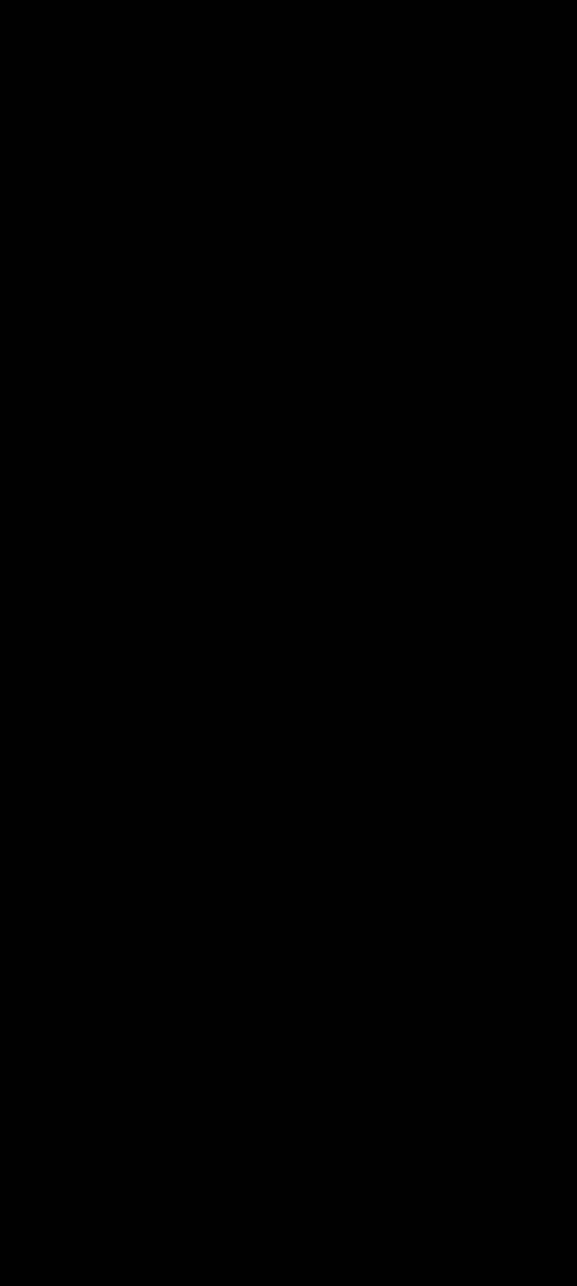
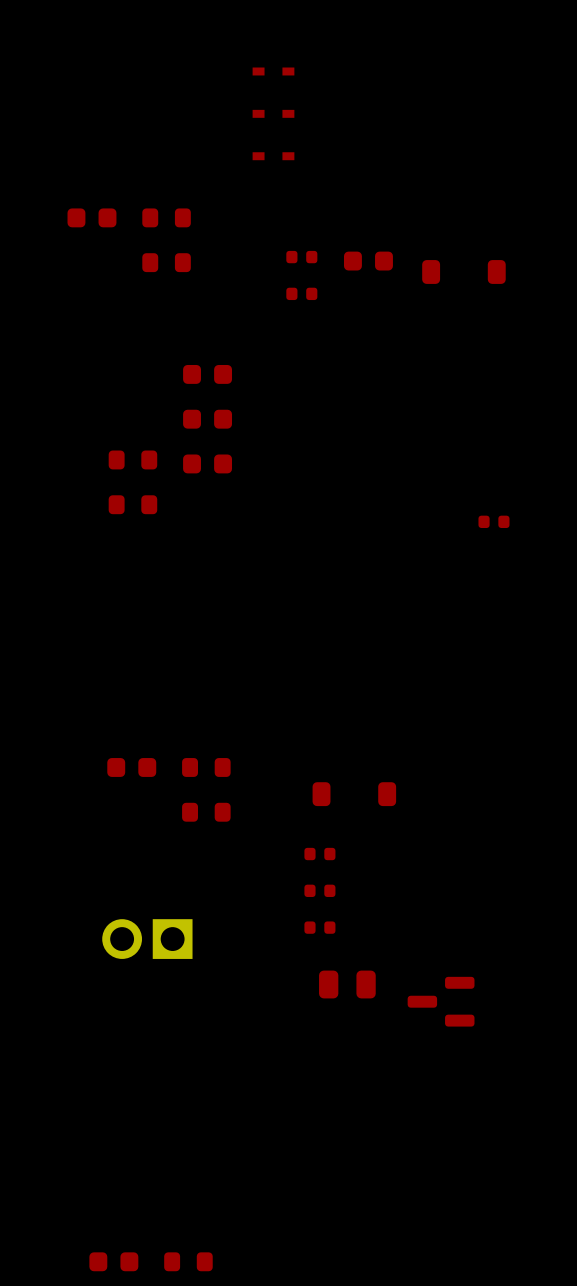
part: none -> (273, 71)
part: none -> (273, 113)
part: none -> (273, 156)
part: none -> (91, 217)
part: none -> (166, 217)
part: none -> (301, 257)
part: none -> (368, 261)
part: none -> (166, 262)
part: none -> (463, 271)
part: none -> (301, 293)
part: none -> (207, 374)
part: none -> (207, 419)
part: none -> (132, 459)
part: none -> (207, 463)
part: none -> (132, 504)
part: none -> (493, 521)
part: none -> (131, 767)
part: none -> (206, 767)
part: none -> (354, 794)
part: none -> (206, 812)
part: none -> (319, 854)
part: none -> (319, 890)
part: none -> (319, 927)
part: none -> (147, 939)
part: none -> (347, 984)
part: none -> (441, 1001)
part: none -> (113, 1261)
part: none -> (188, 1261)

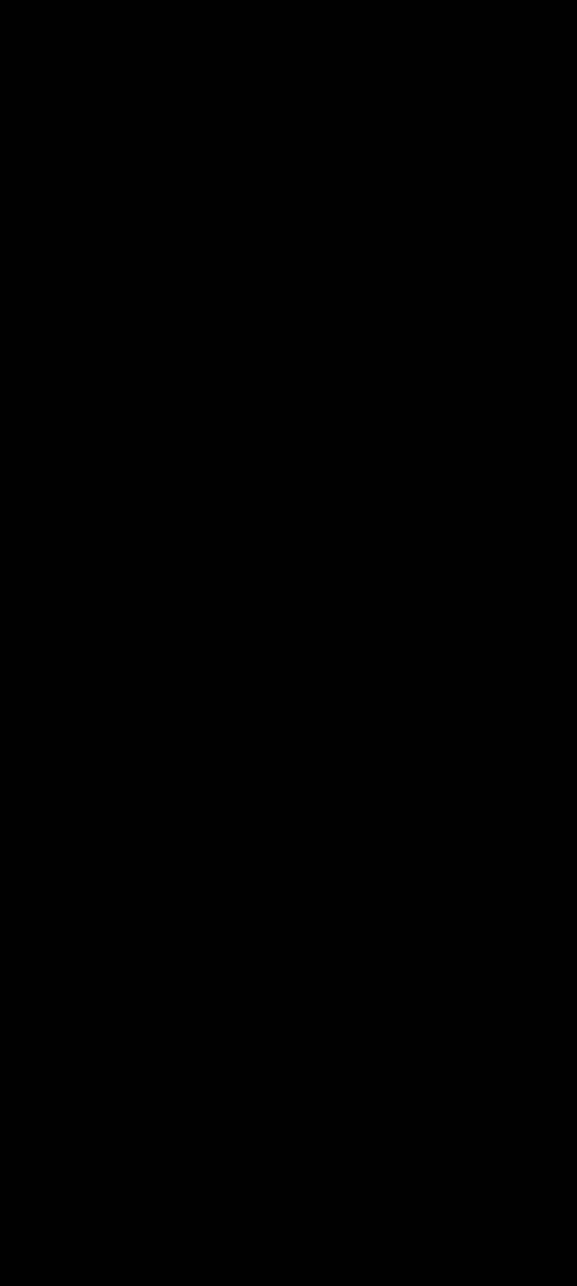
part: (273, 71) -> none
part: (273, 113) -> none
part: (273, 156) -> none
part: (91, 217) -> none
part: (166, 217) -> none
part: (301, 257) -> none
part: (368, 261) -> none
part: (166, 262) -> none
part: (463, 271) -> none
part: (301, 293) -> none
part: (207, 374) -> none
part: (207, 419) -> none
part: (132, 459) -> none
part: (207, 463) -> none
part: (132, 504) -> none
part: (493, 521) -> none
part: (131, 767) -> none
part: (206, 767) -> none
part: (354, 794) -> none
part: (206, 812) -> none
part: (319, 854) -> none
part: (319, 890) -> none
part: (319, 927) -> none
part: (147, 939) -> none
part: (347, 984) -> none
part: (441, 1001) -> none
part: (113, 1261) -> none
part: (188, 1261) -> none

